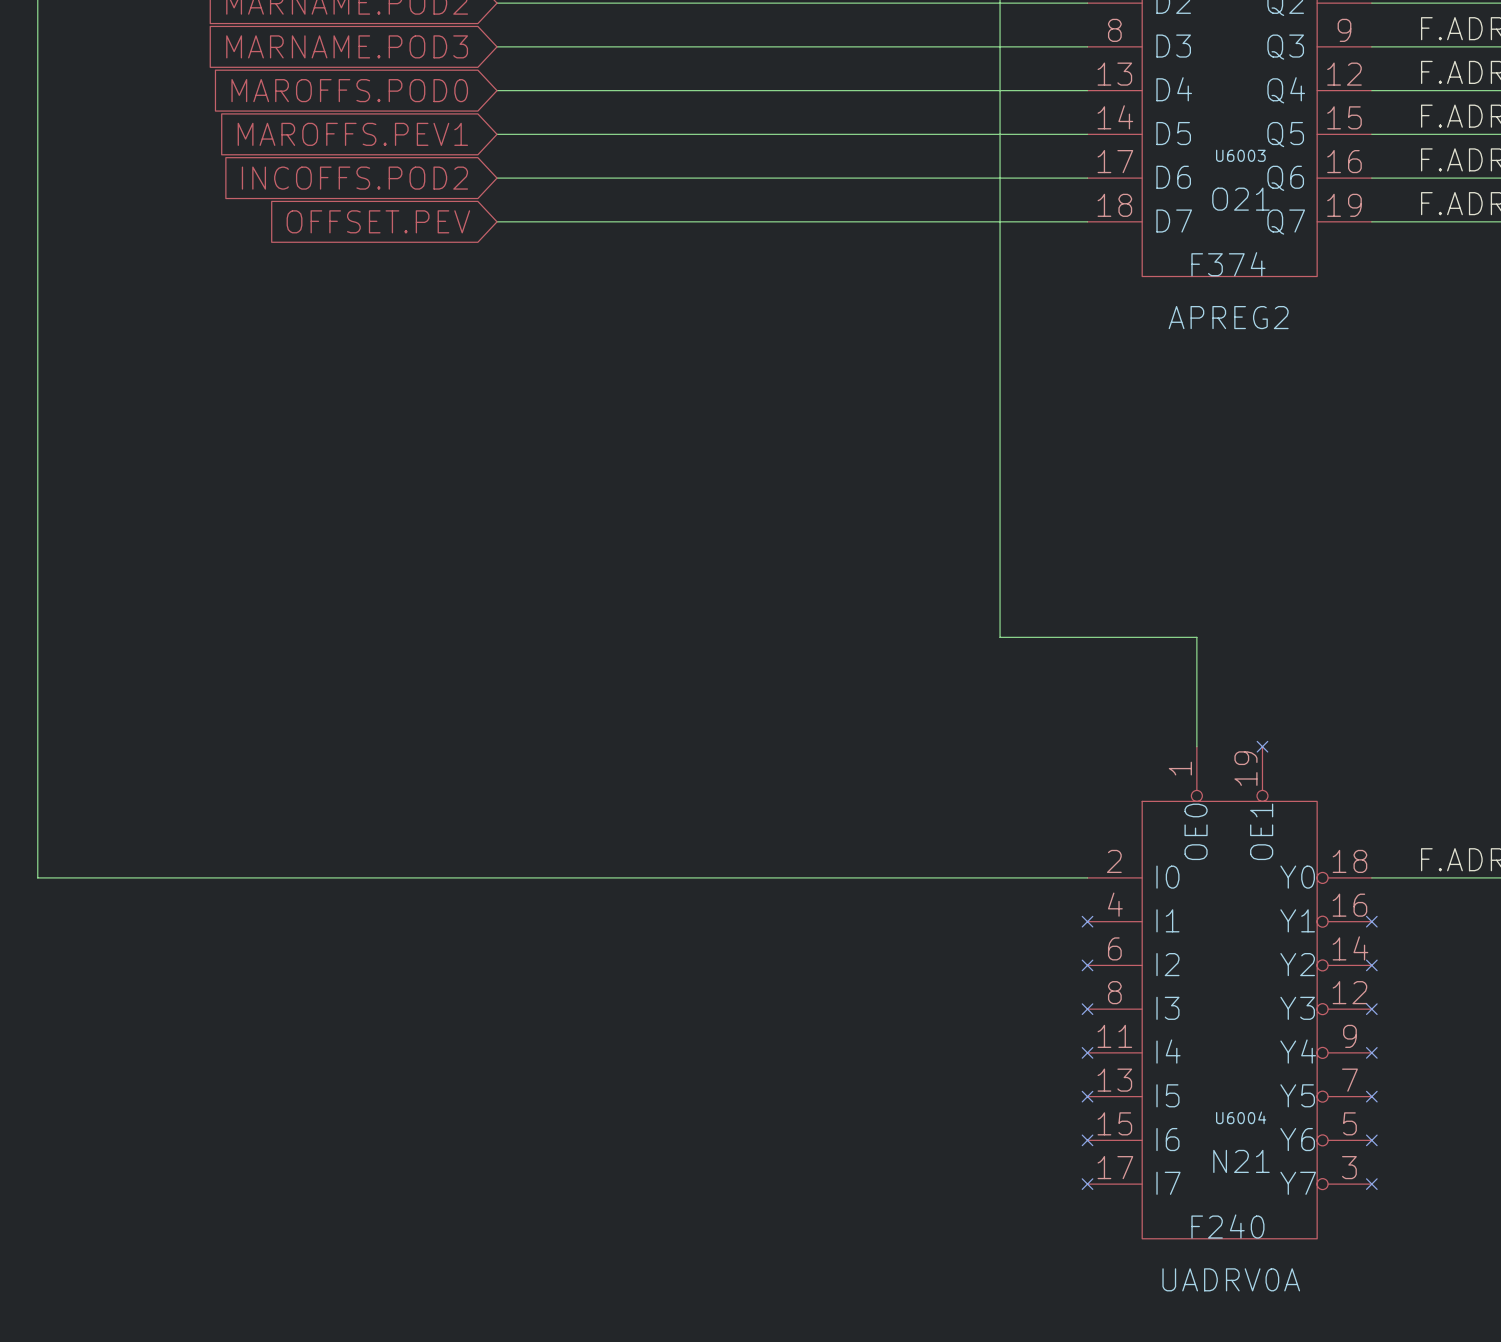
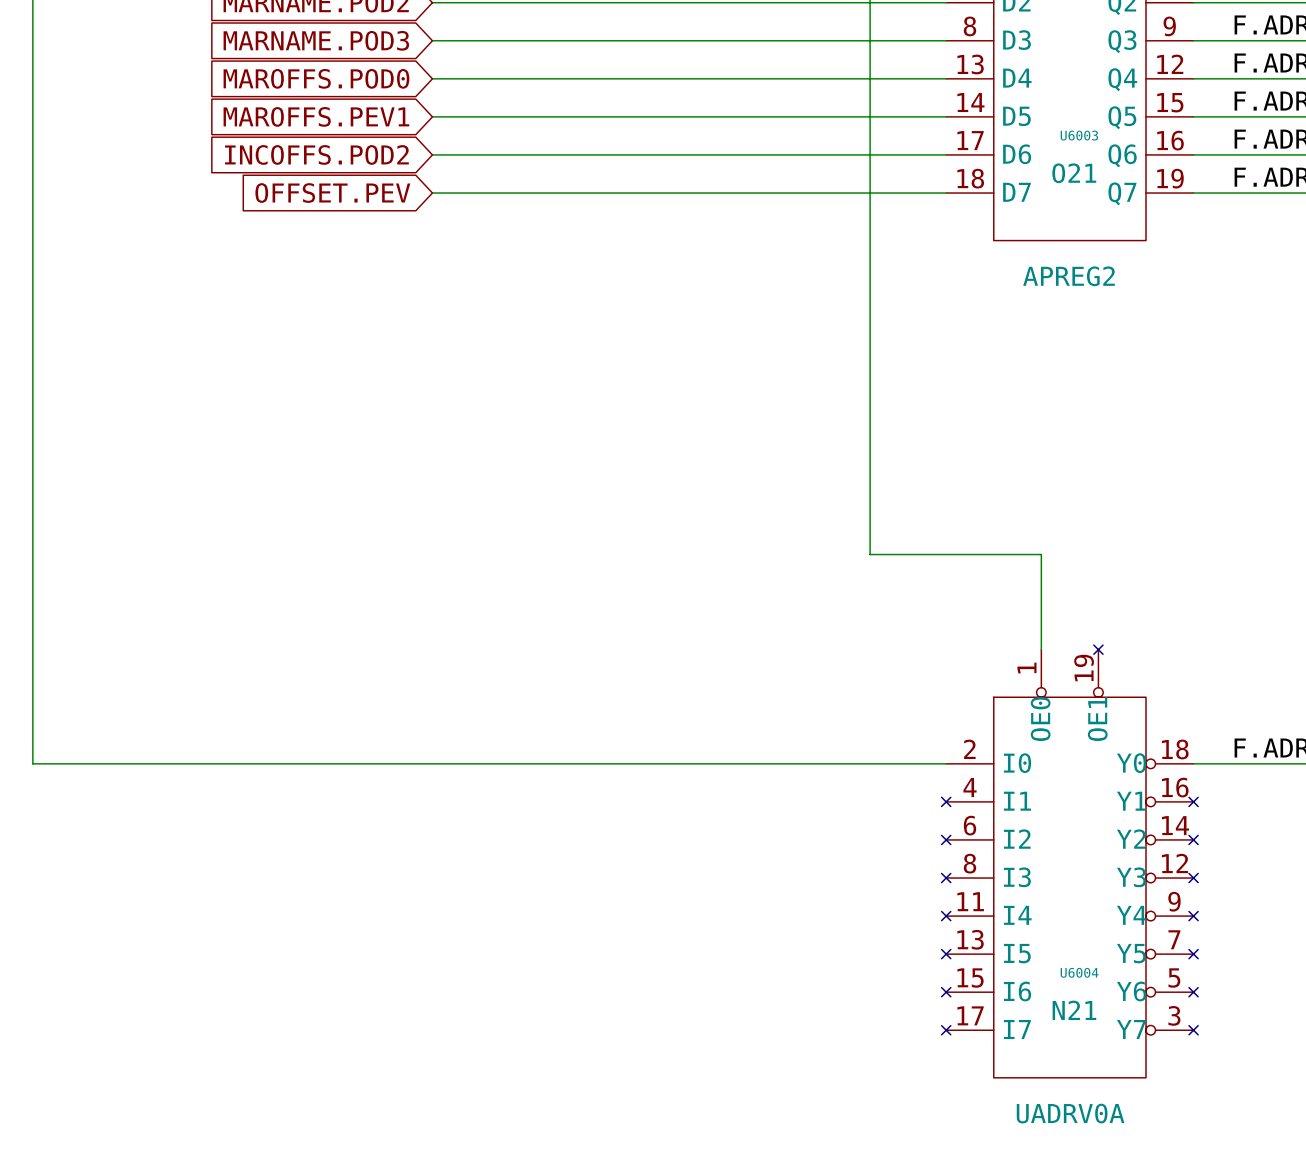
U6003 value: F374 (1228, 264) -> none
U6004 value: F240 (1227, 1226) -> none

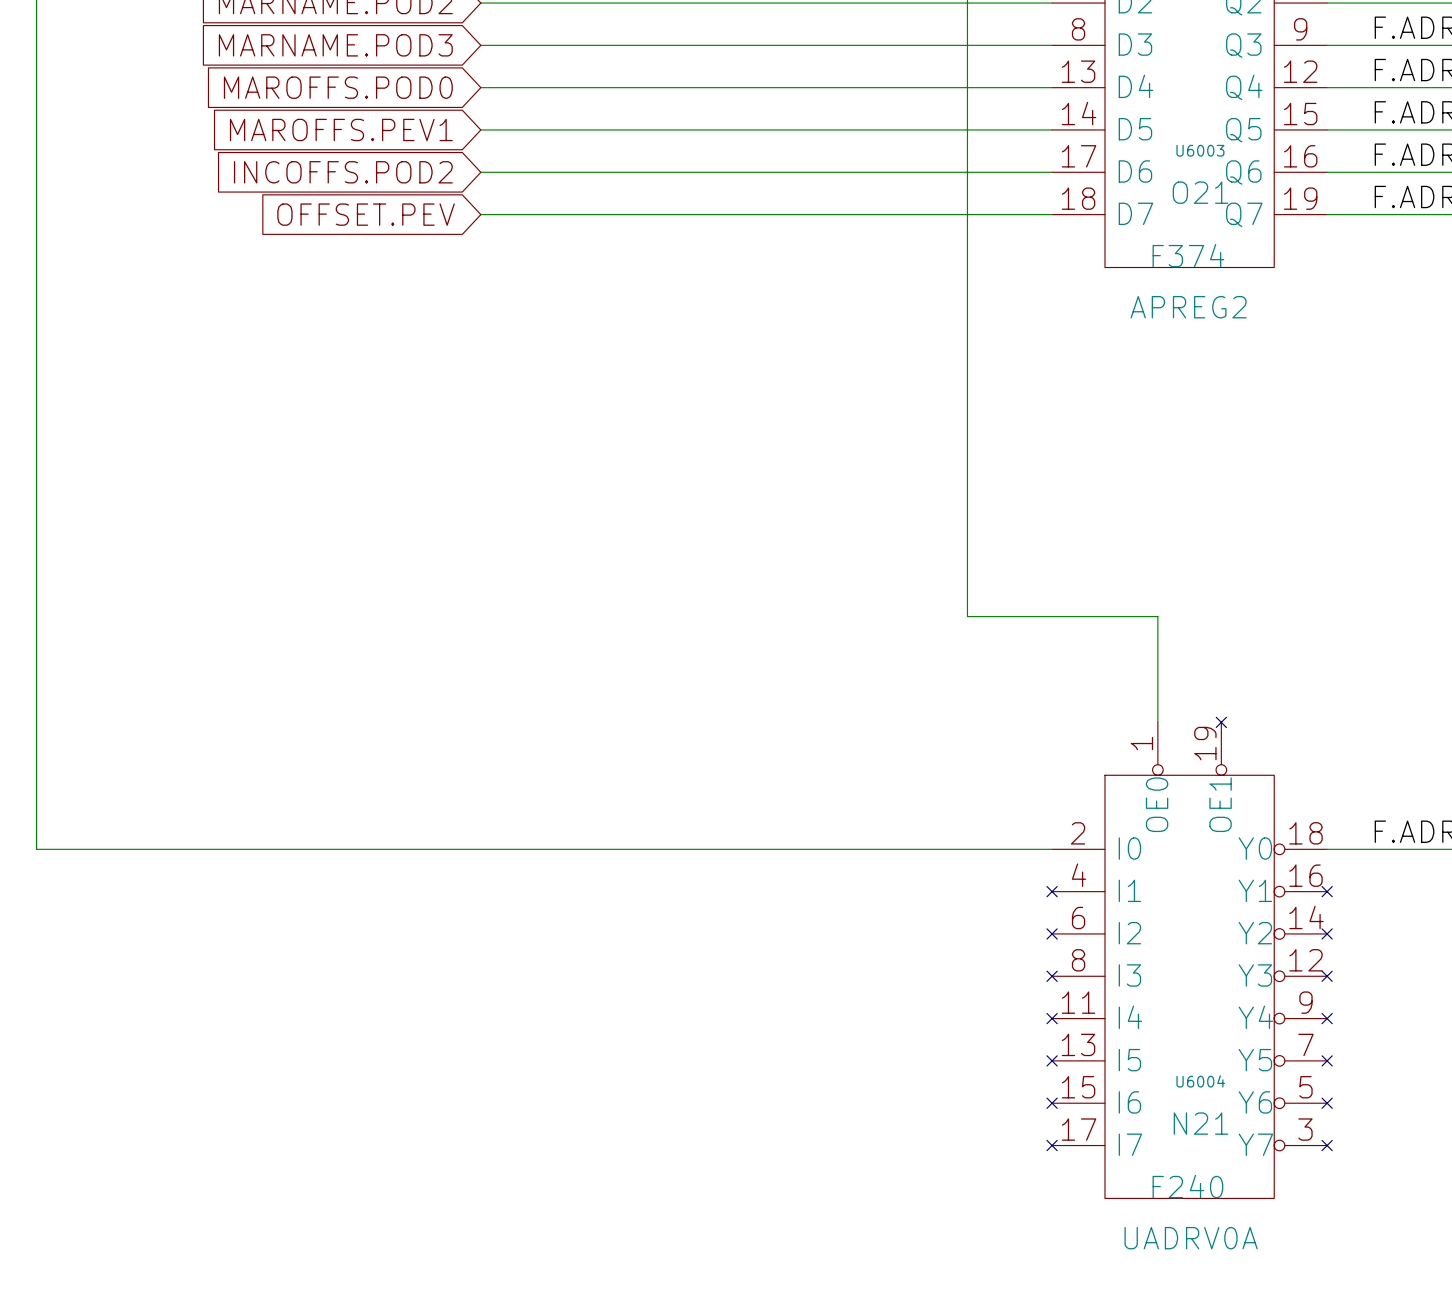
U6003 value: none -> F374 (1188, 255)
U6004 value: none -> F240 (1187, 1186)

